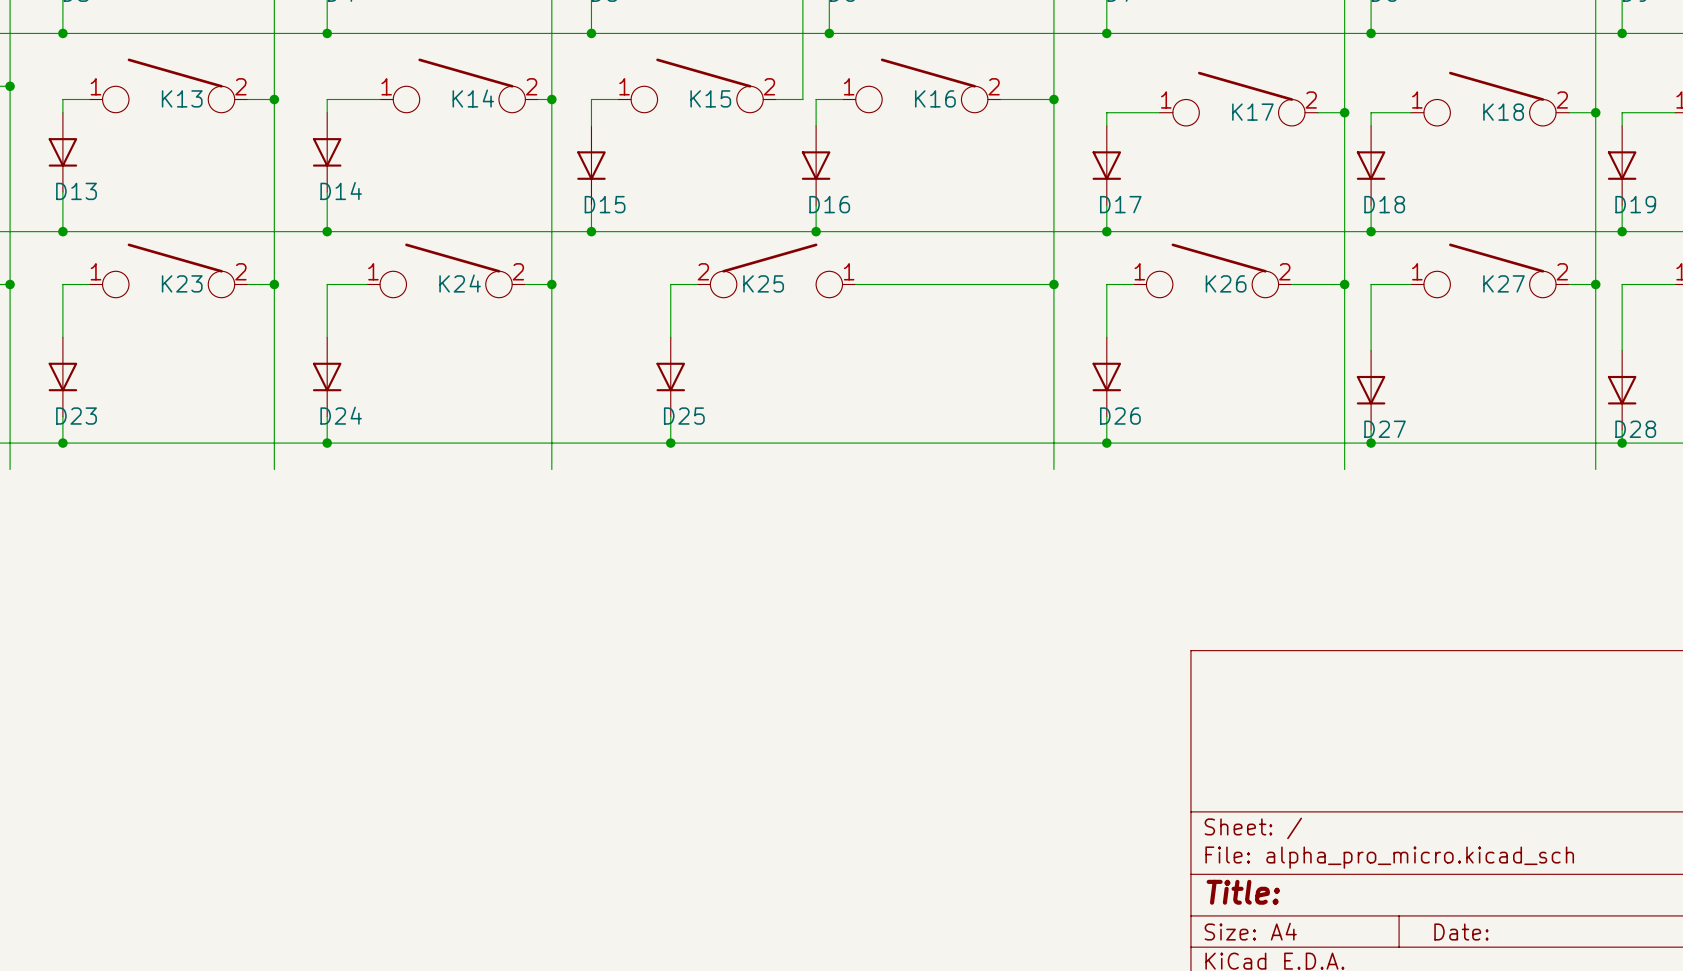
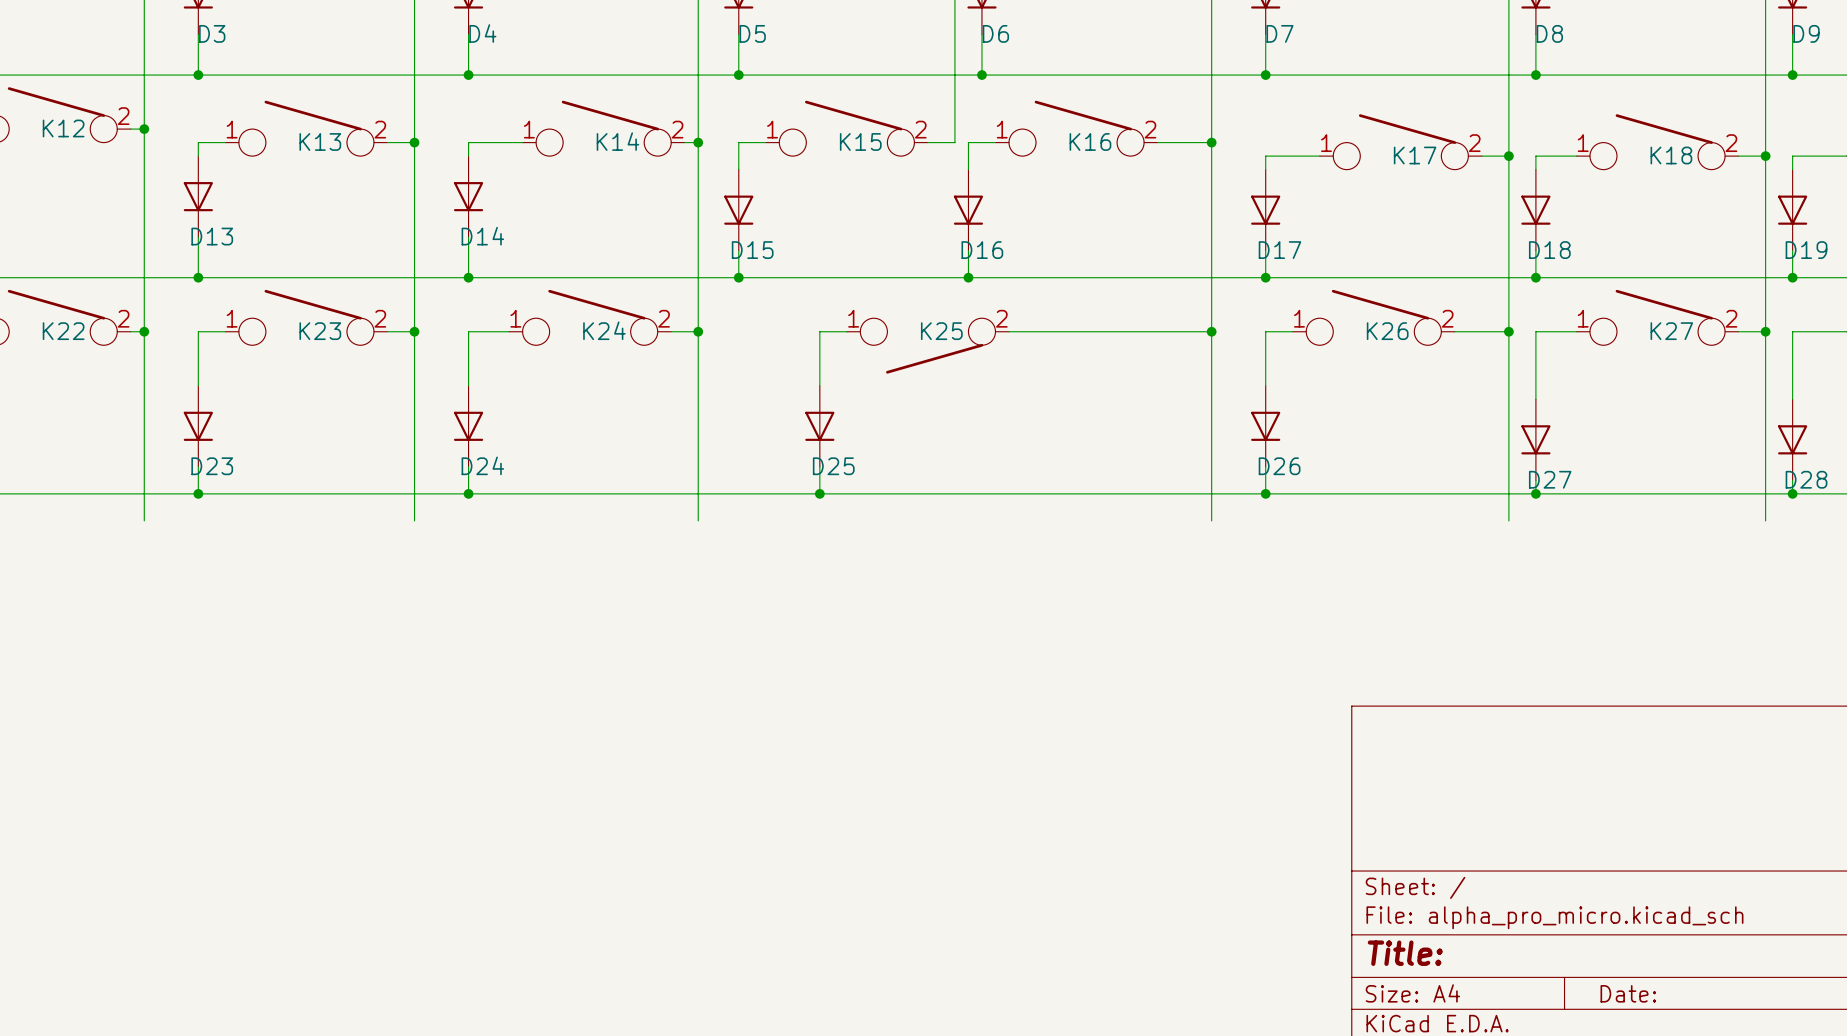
K25 rotation: 0° (776, 270) -> 180° (927, 345)

